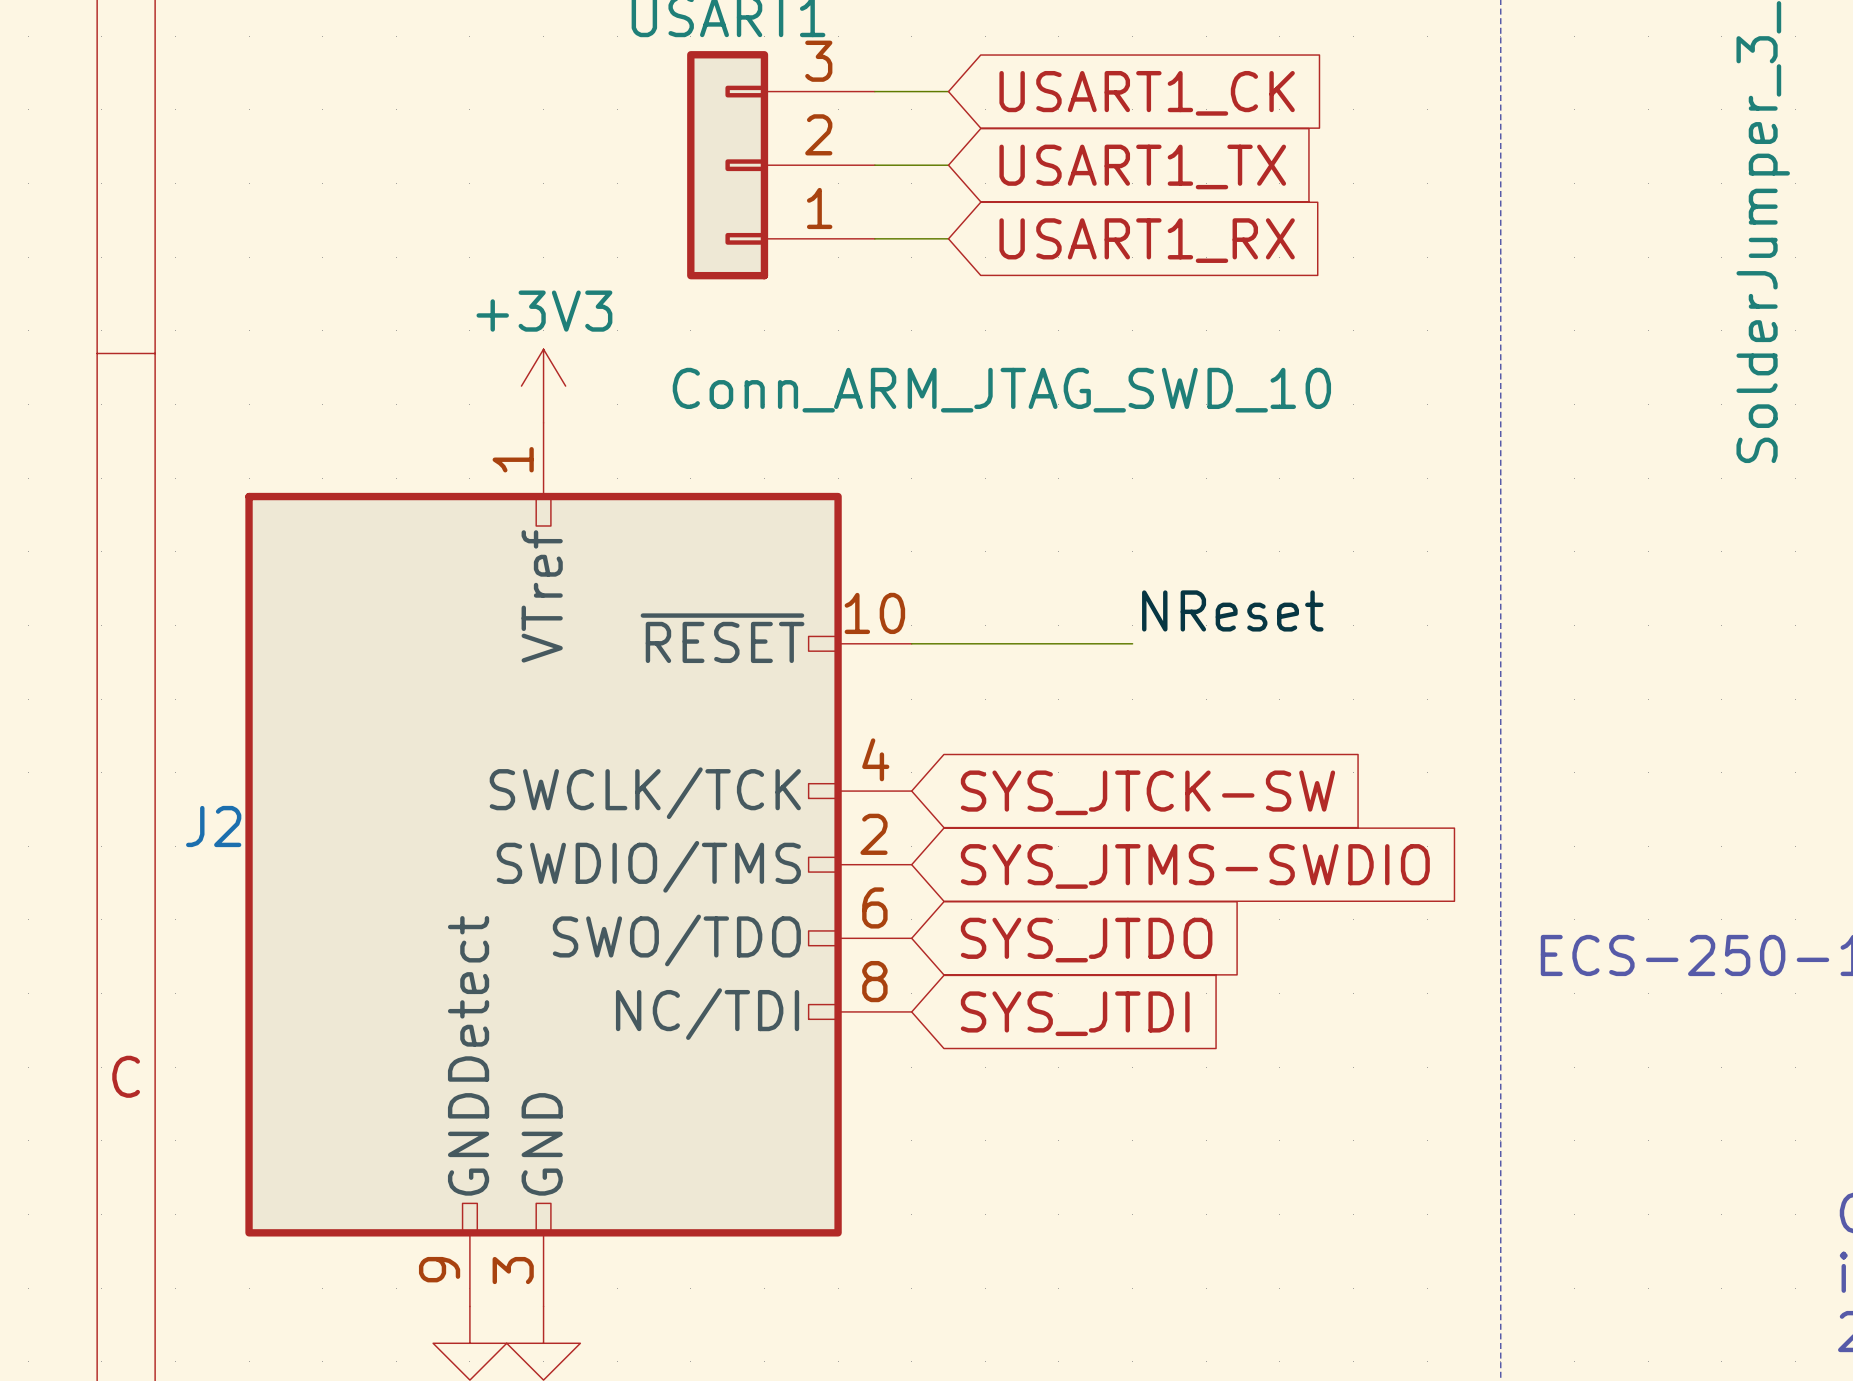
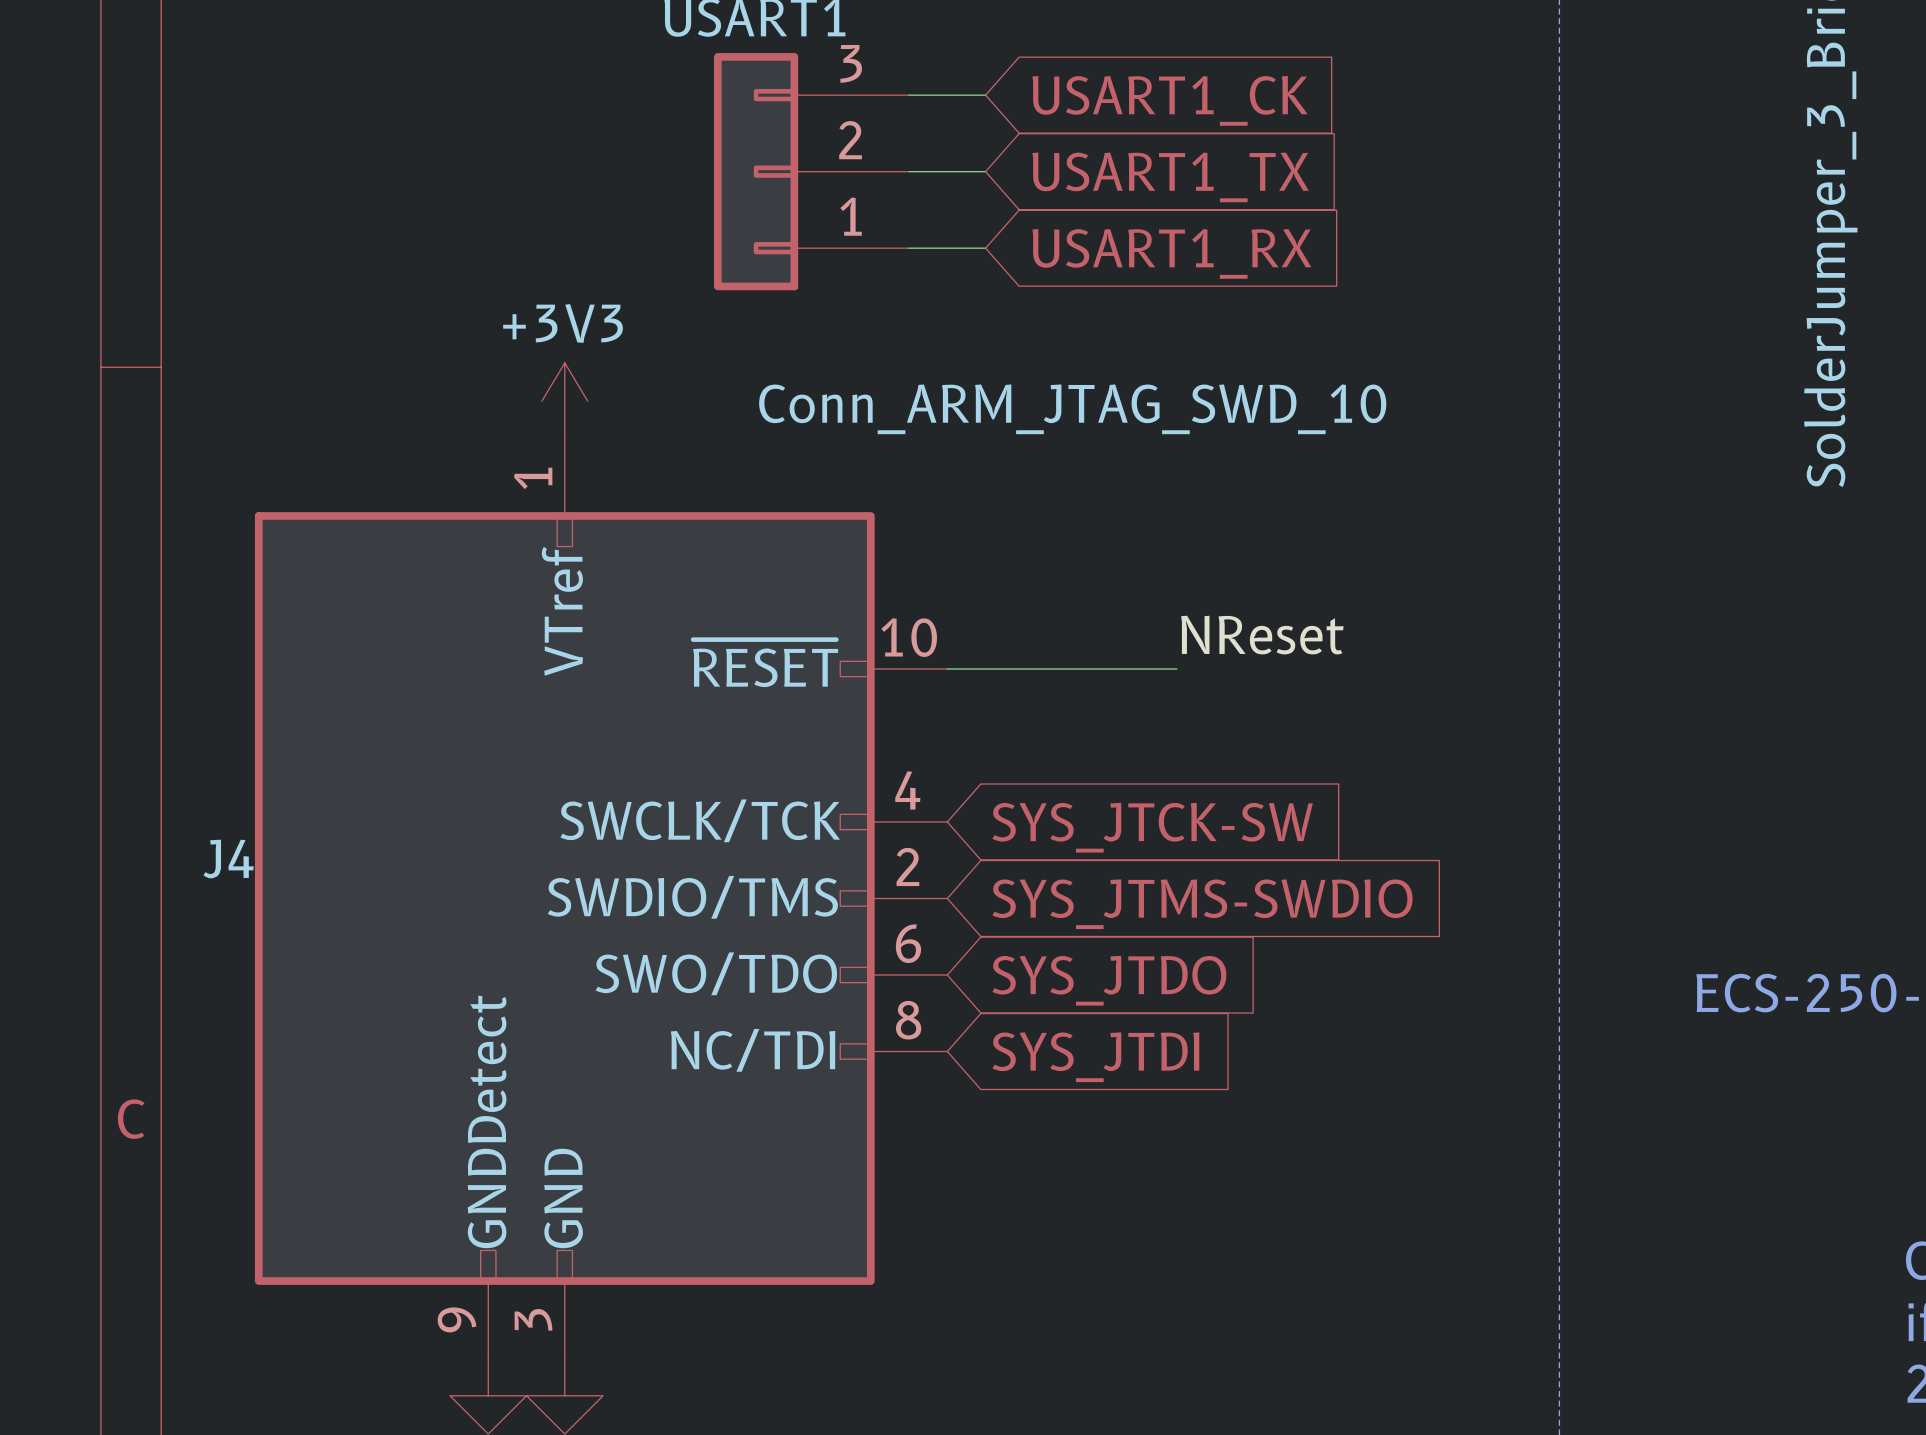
J2 name: J2 (213, 826) -> J4 (228, 859)

